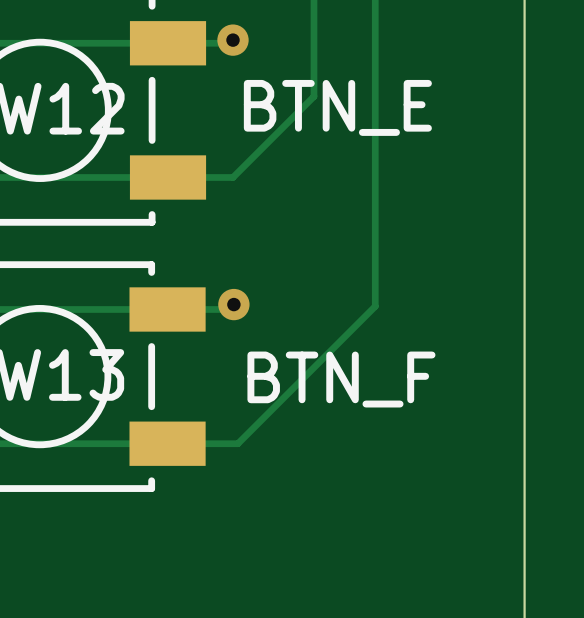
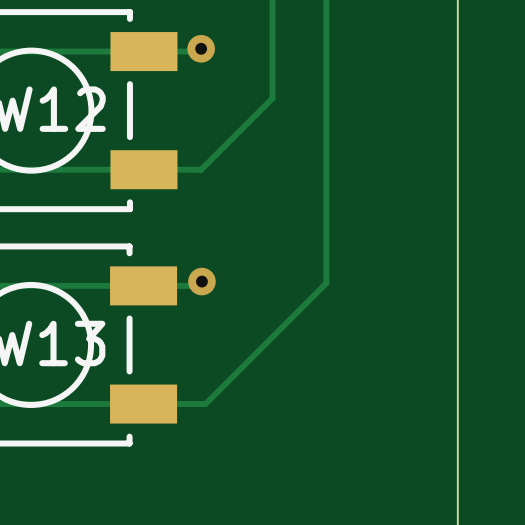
text: BTN_E (337, 107) -> none
text: BTN_F (341, 379) -> none

